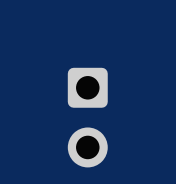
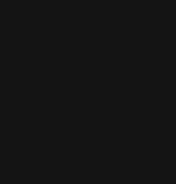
part: (87, 117) -> none

